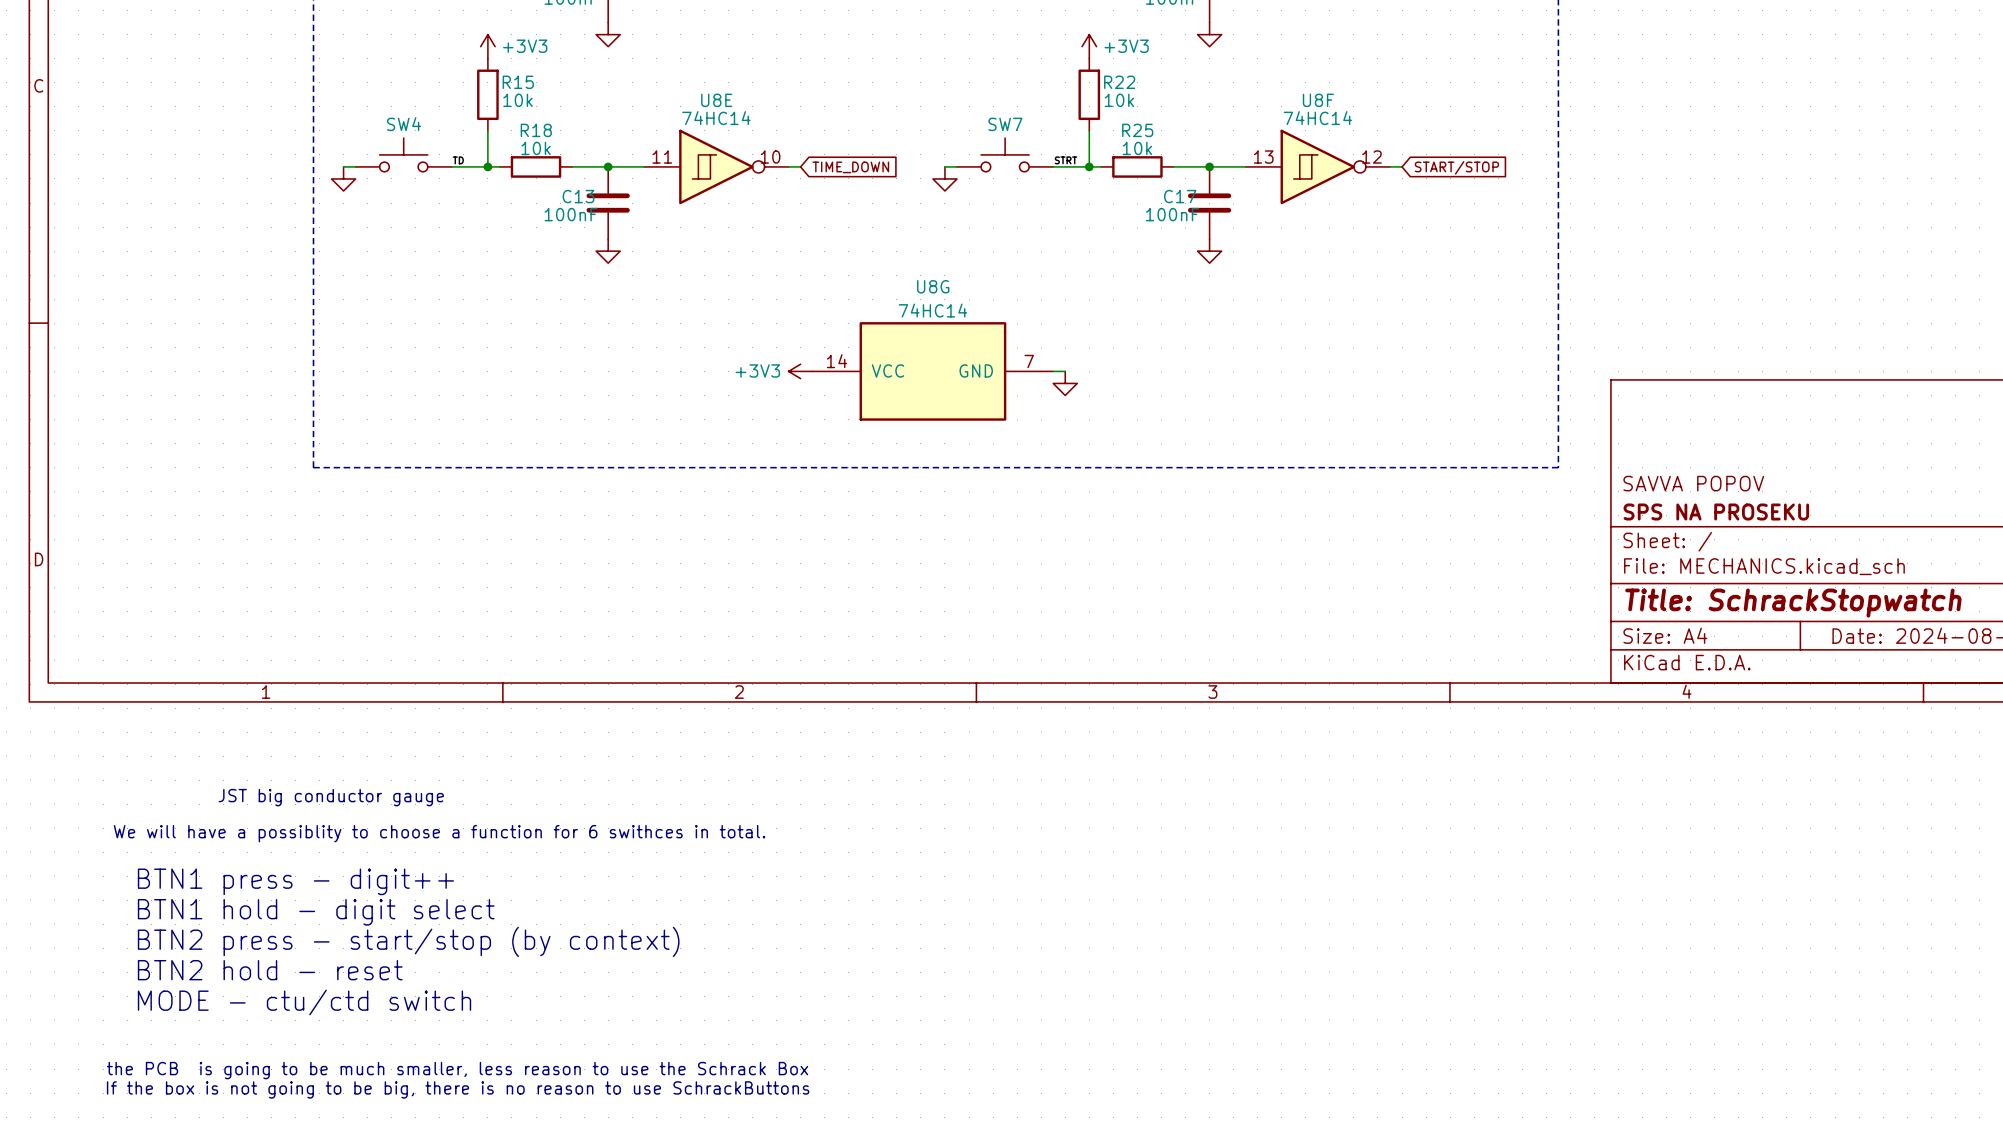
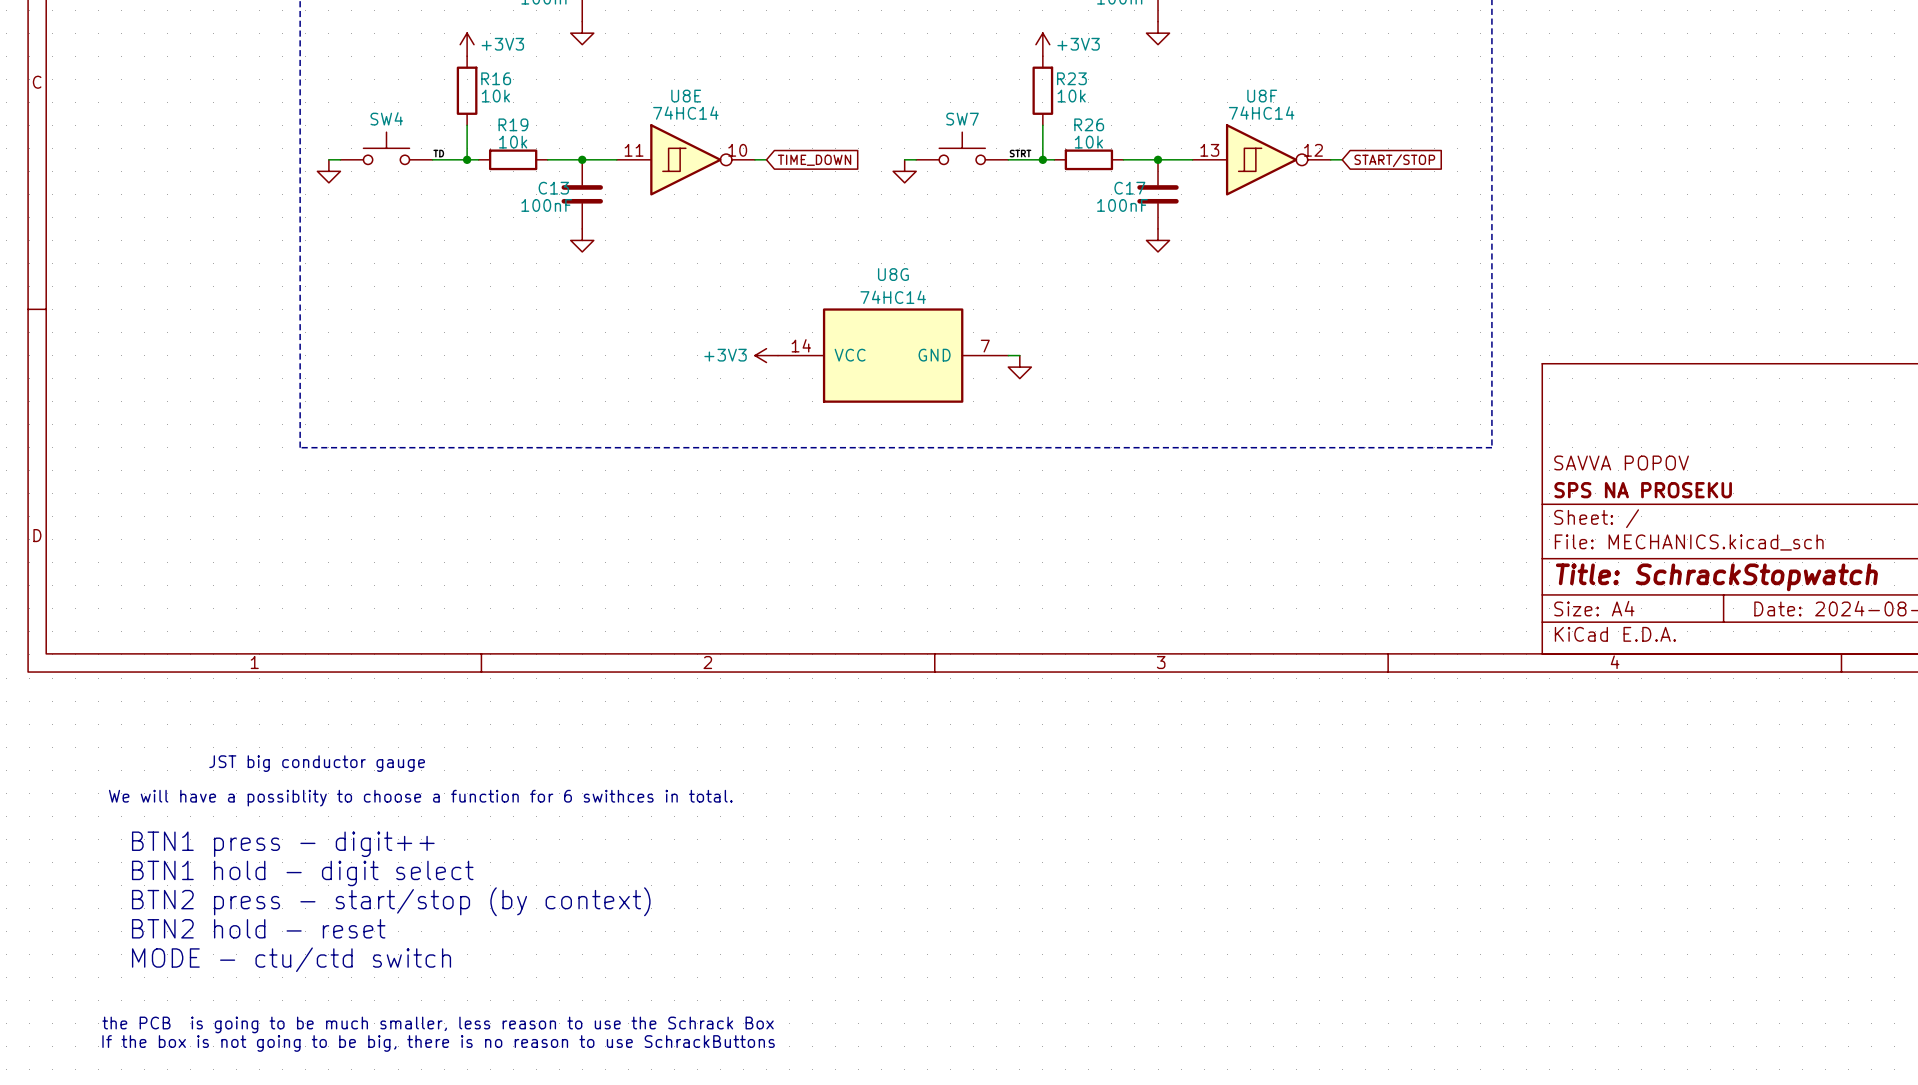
R15 name: R15 (518, 82) -> R16 (496, 78)
R22 name: R22 (1119, 82) -> R23 (1071, 78)
R18 name: R18 (536, 130) -> R19 (513, 124)
R25 name: R25 (1137, 130) -> R26 (1089, 124)

